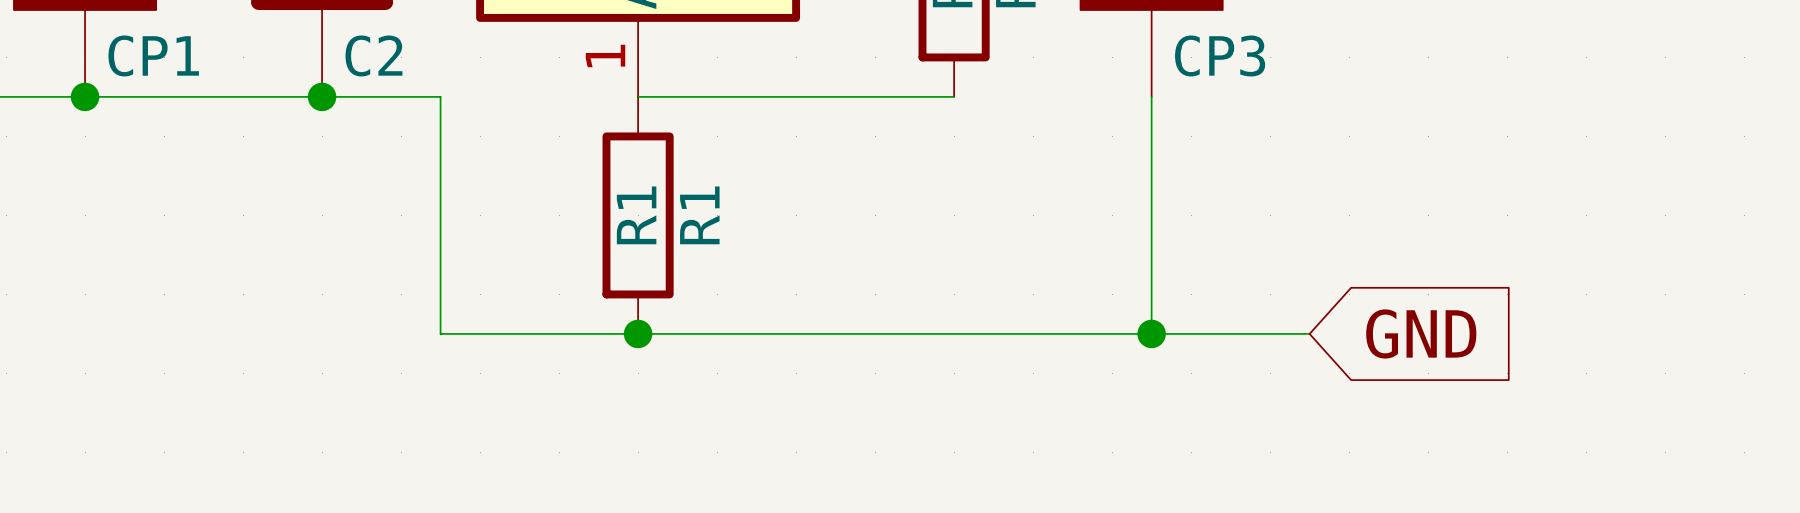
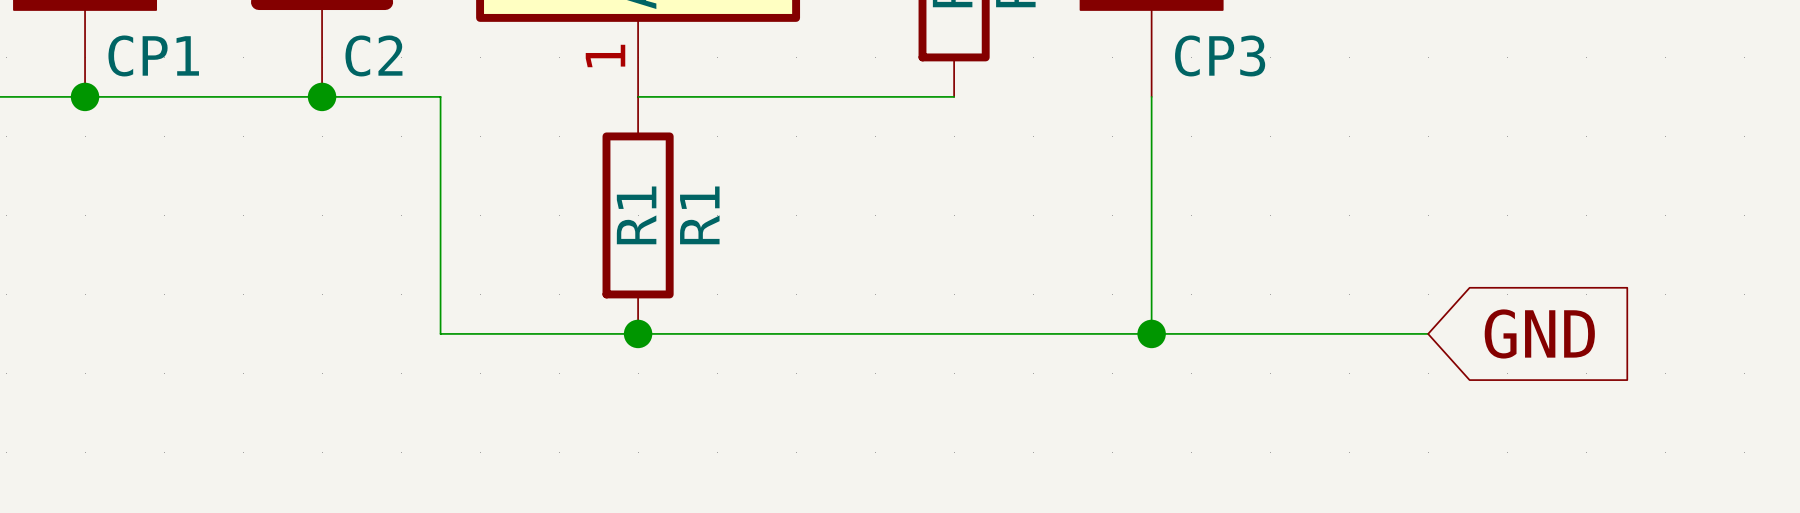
wire: none -> (1309, 333) (1428, 333)
global label position: GND (1421, 333) -> GND (1539, 333)

